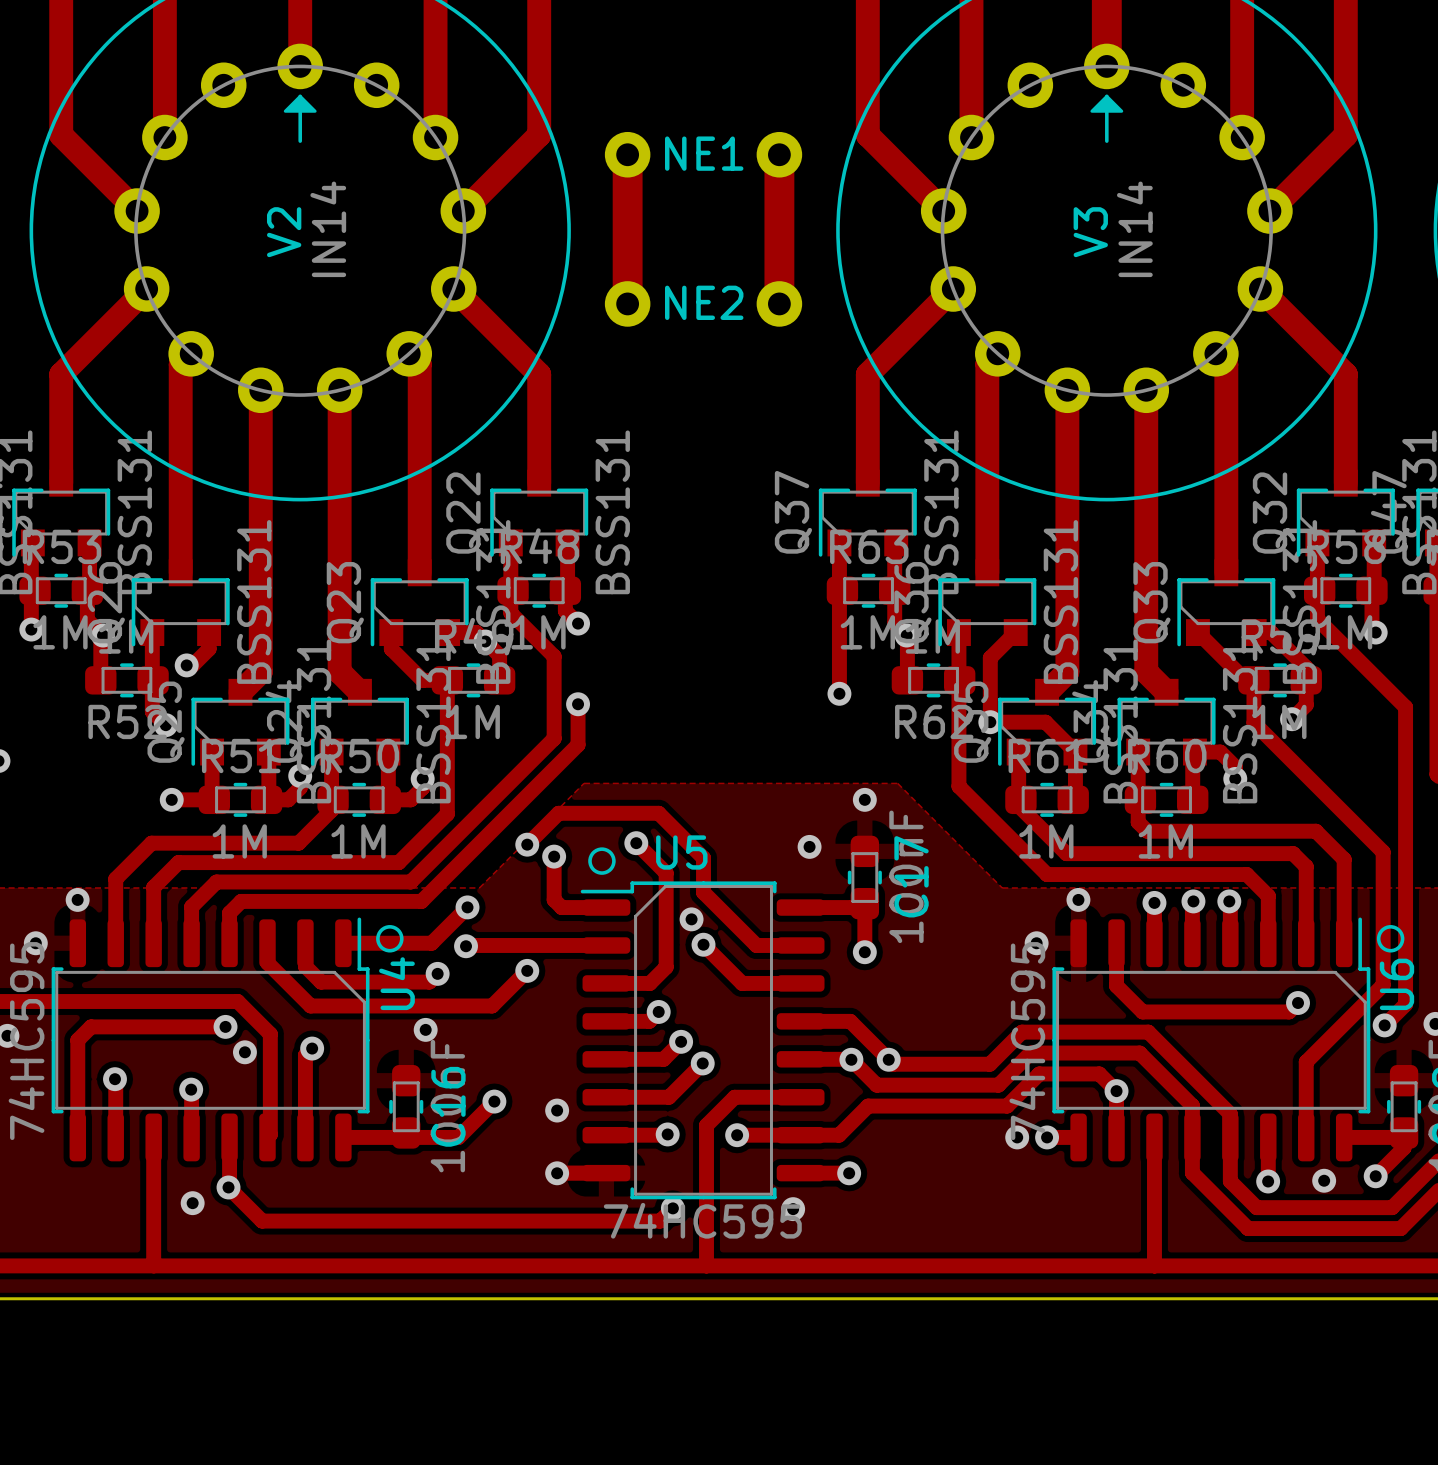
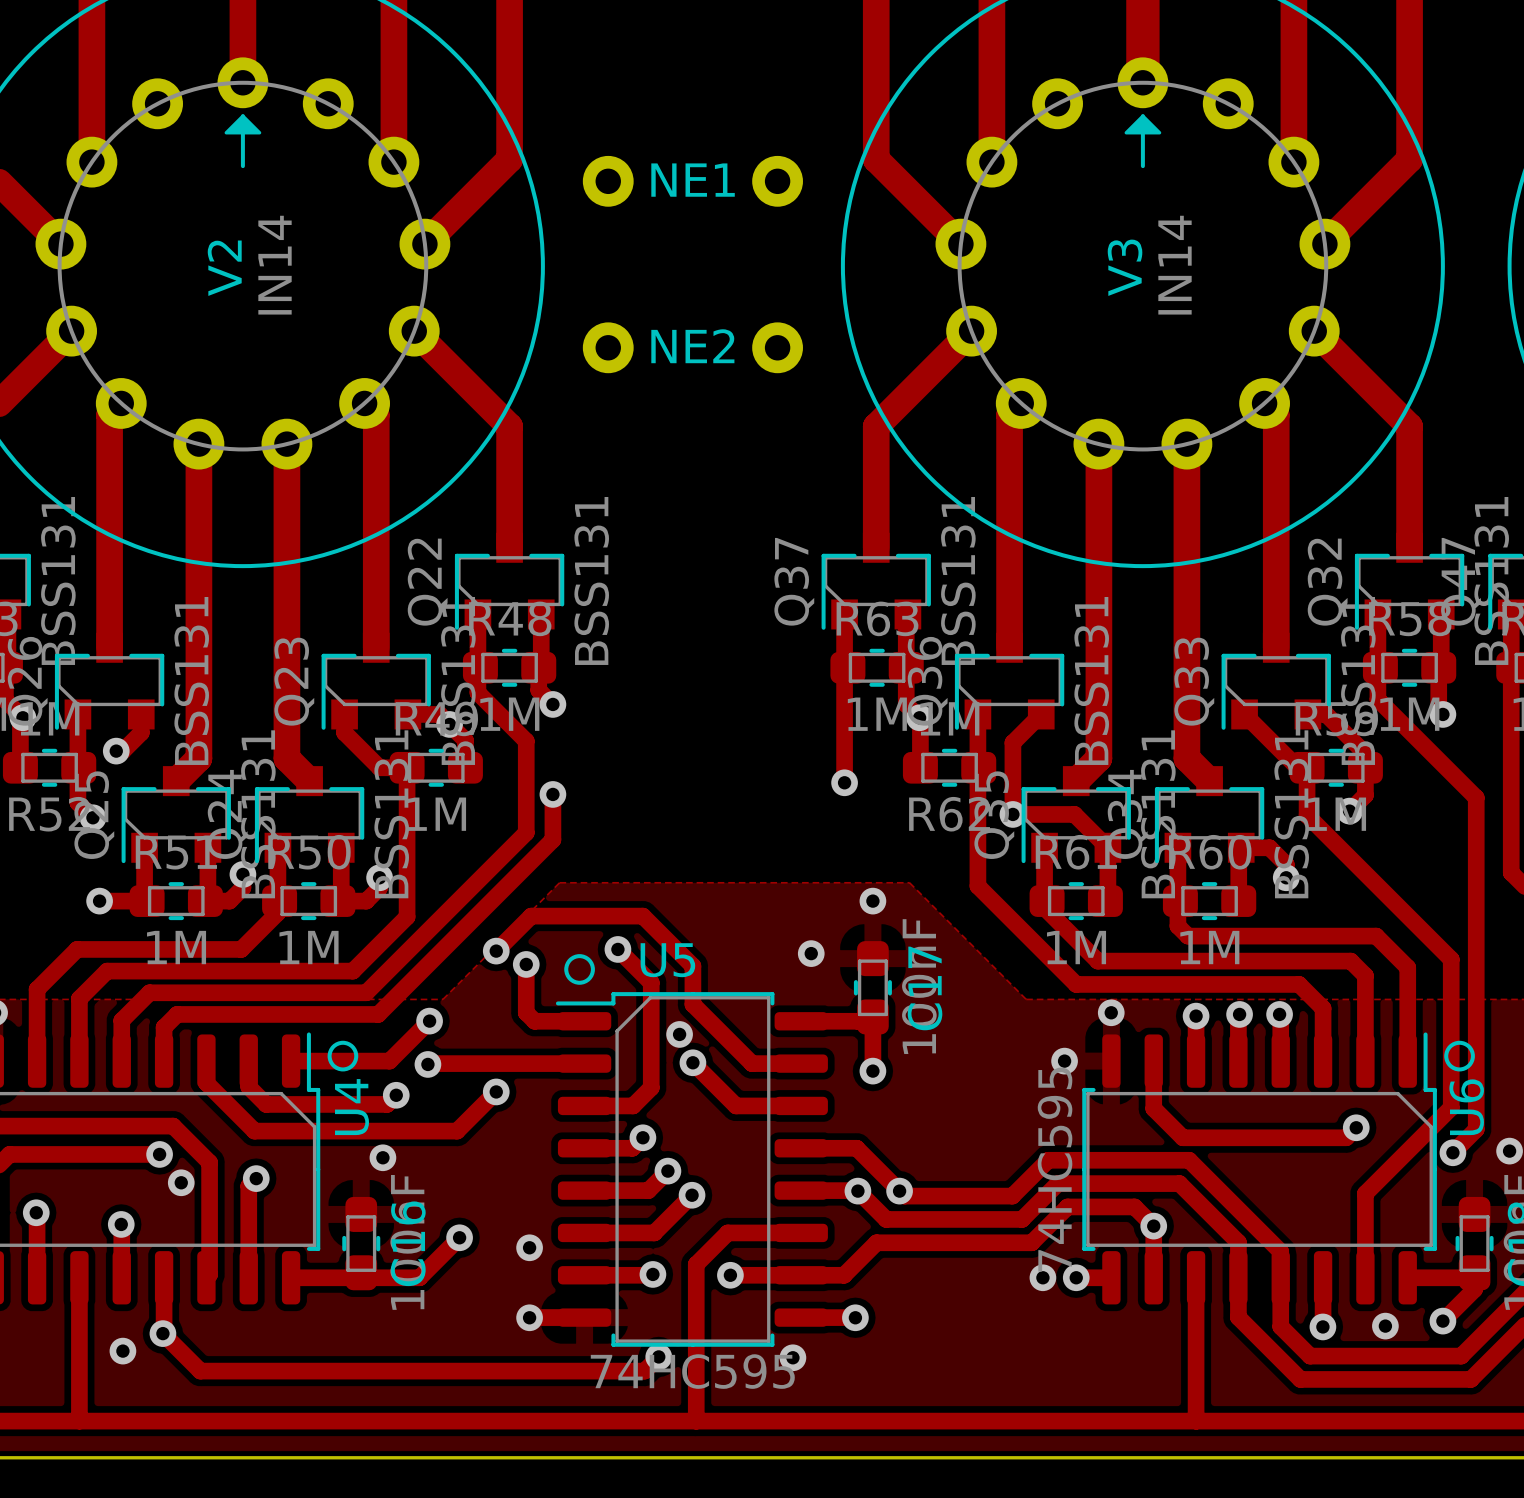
track: (627, 154) (627, 303) -> none
track: (779, 154) (779, 303) -> none

